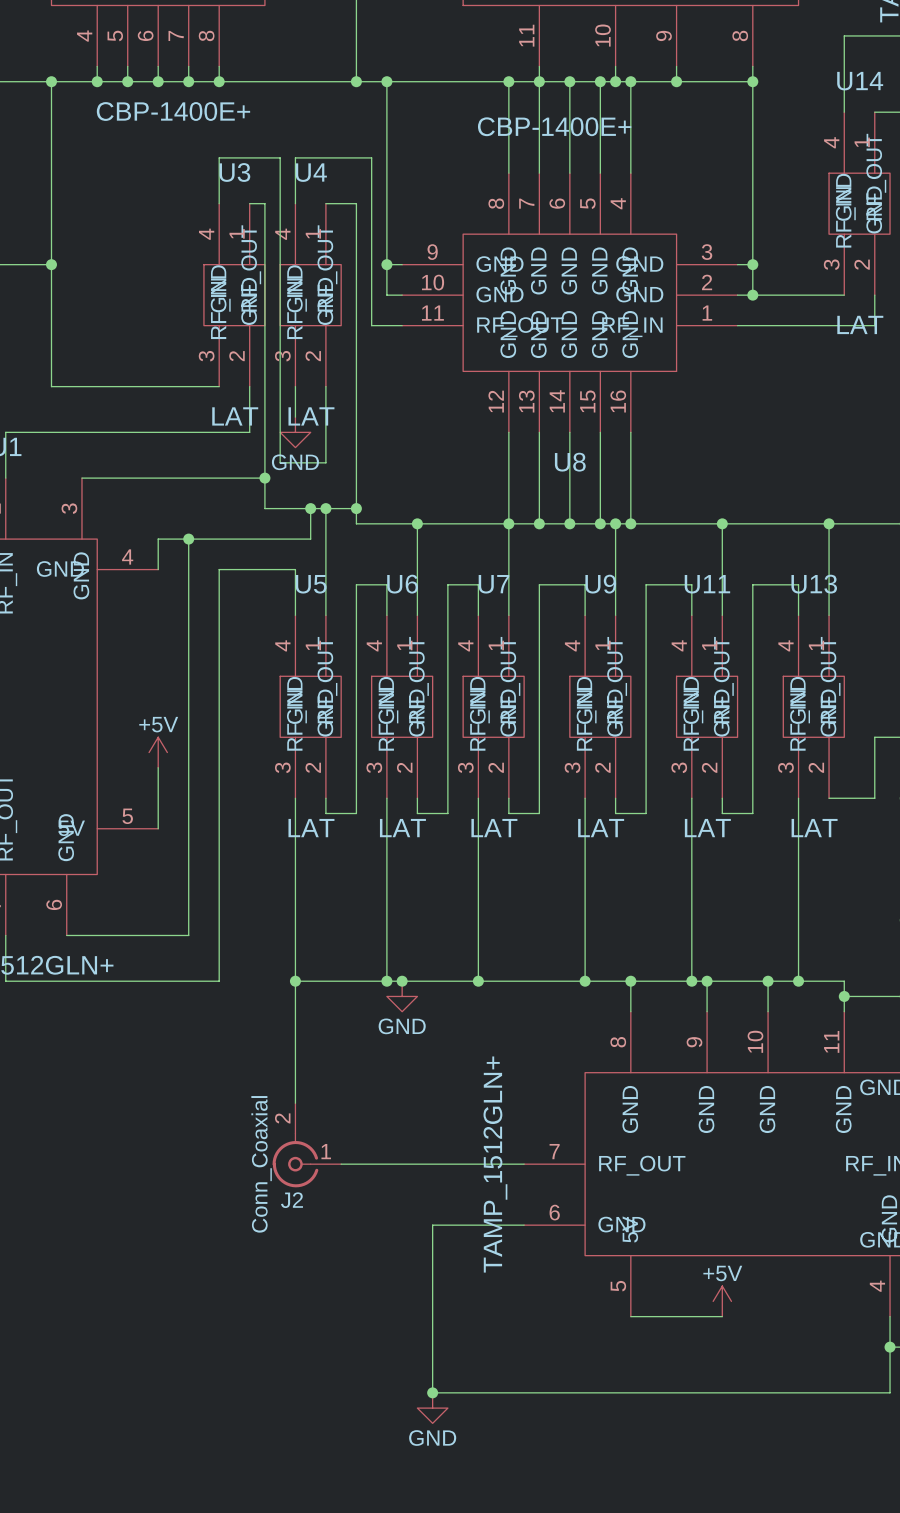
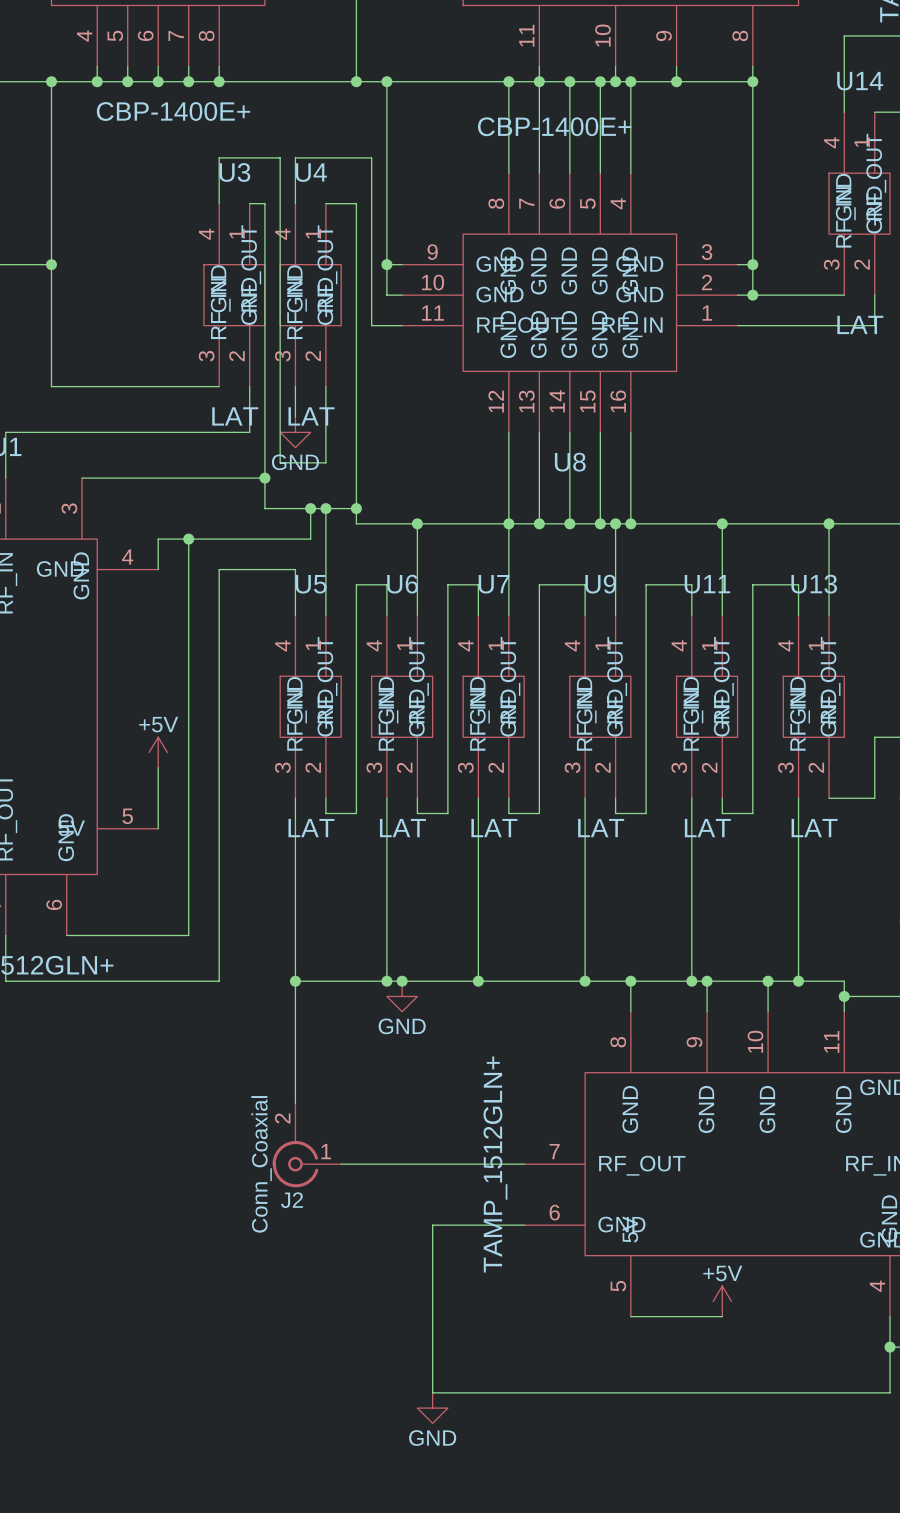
junction: (432, 1392) -> none

